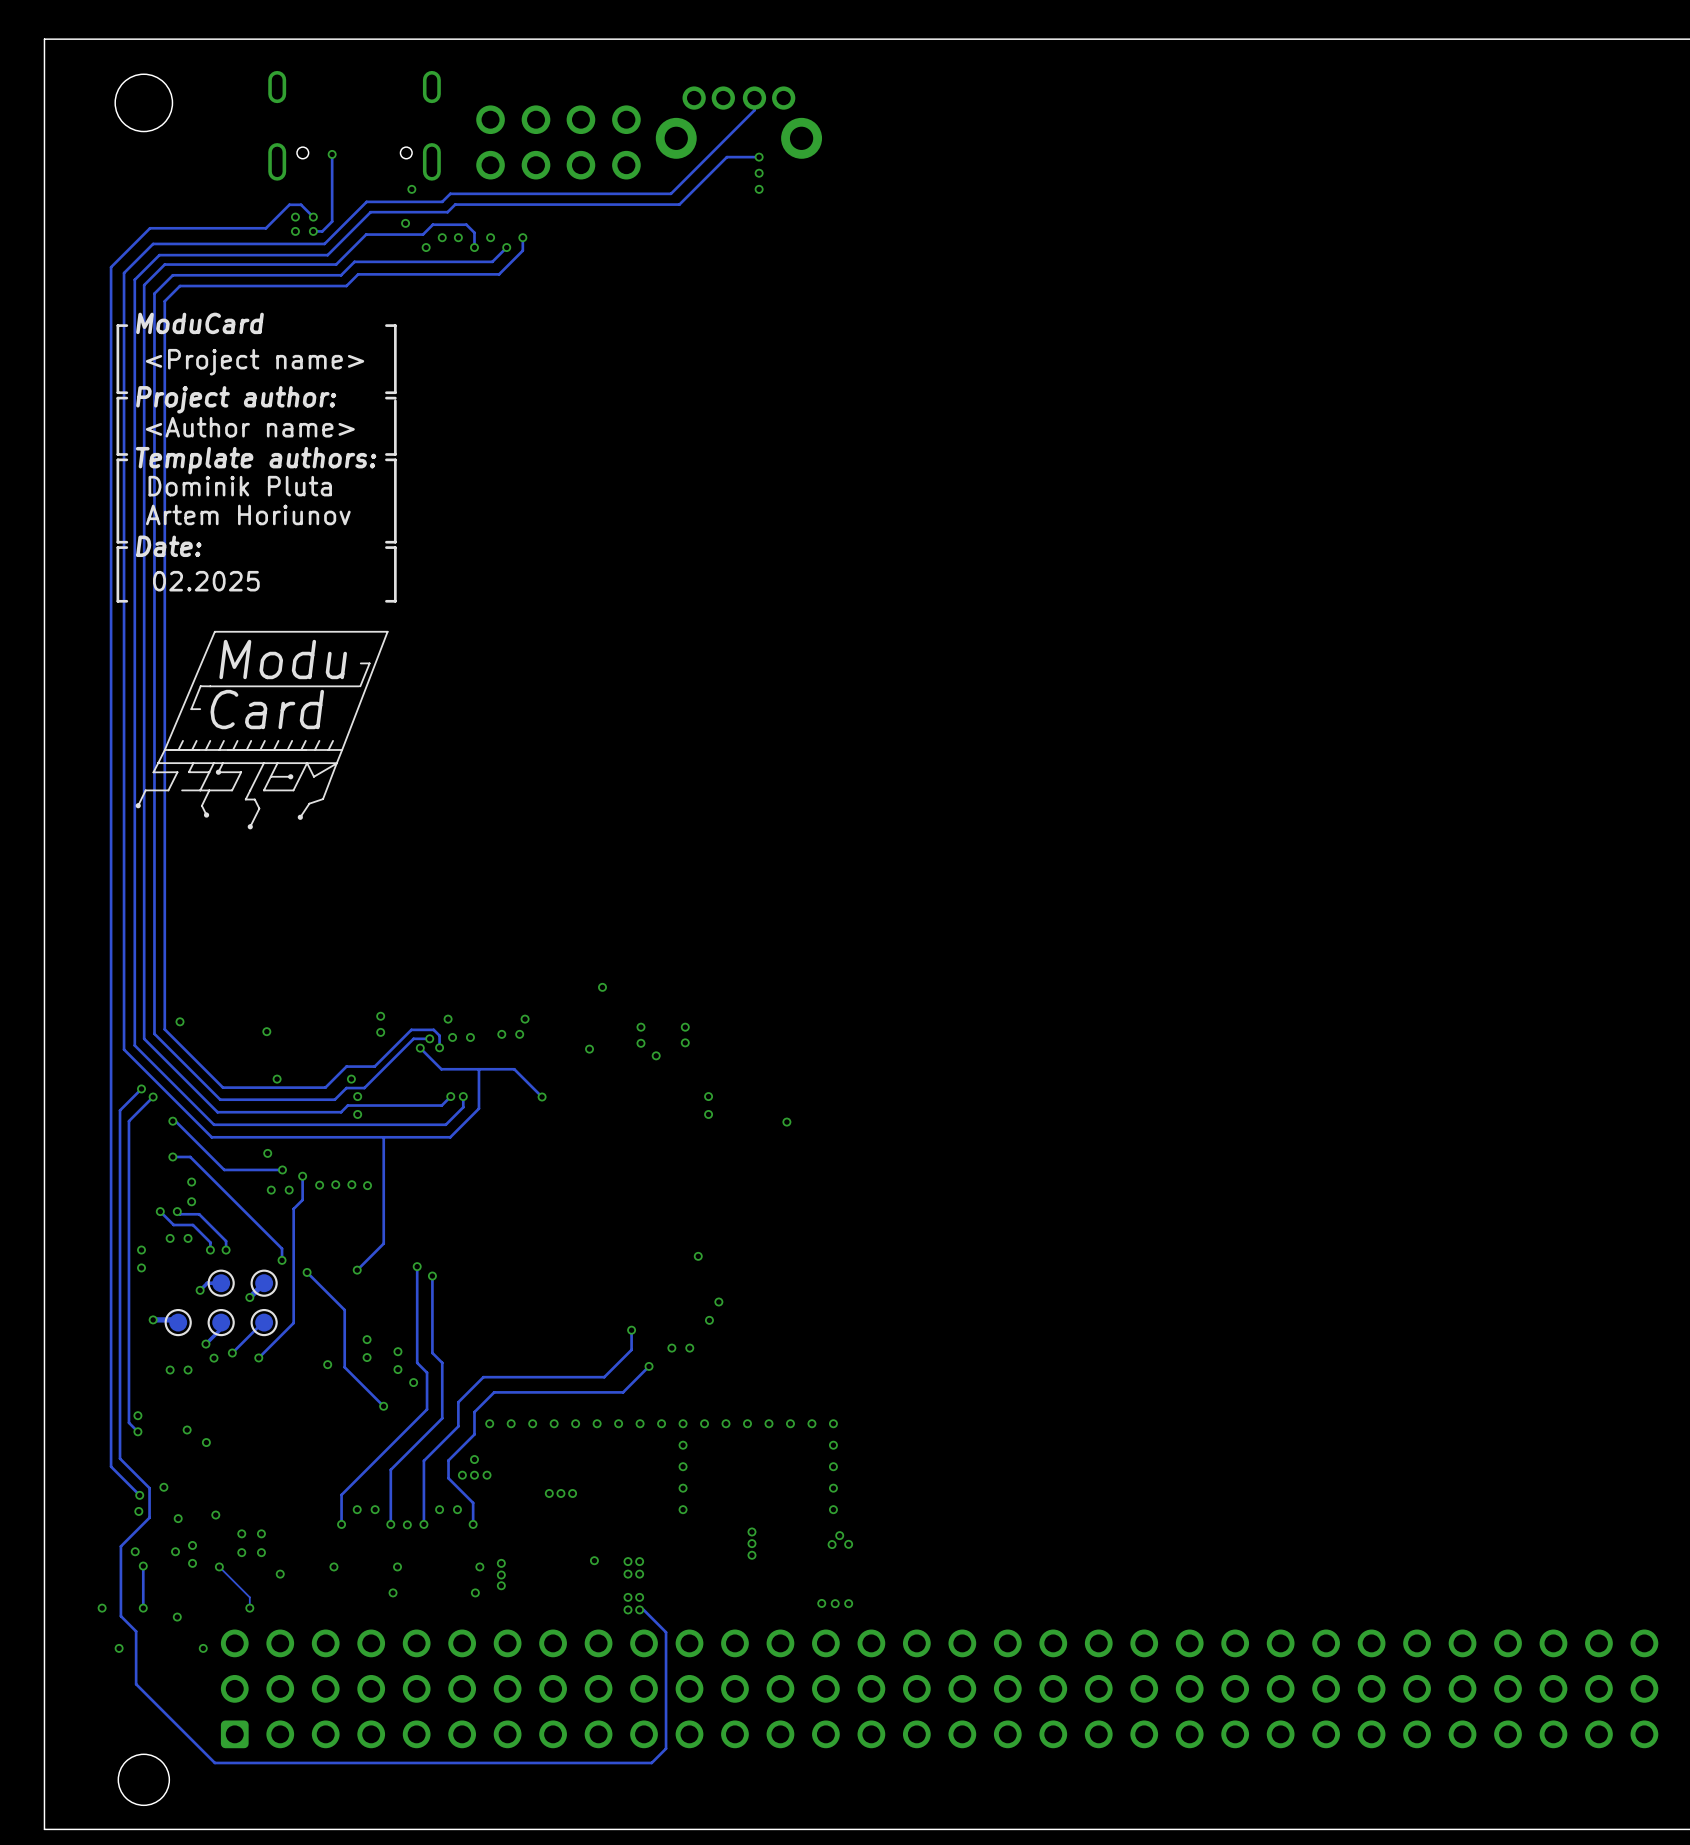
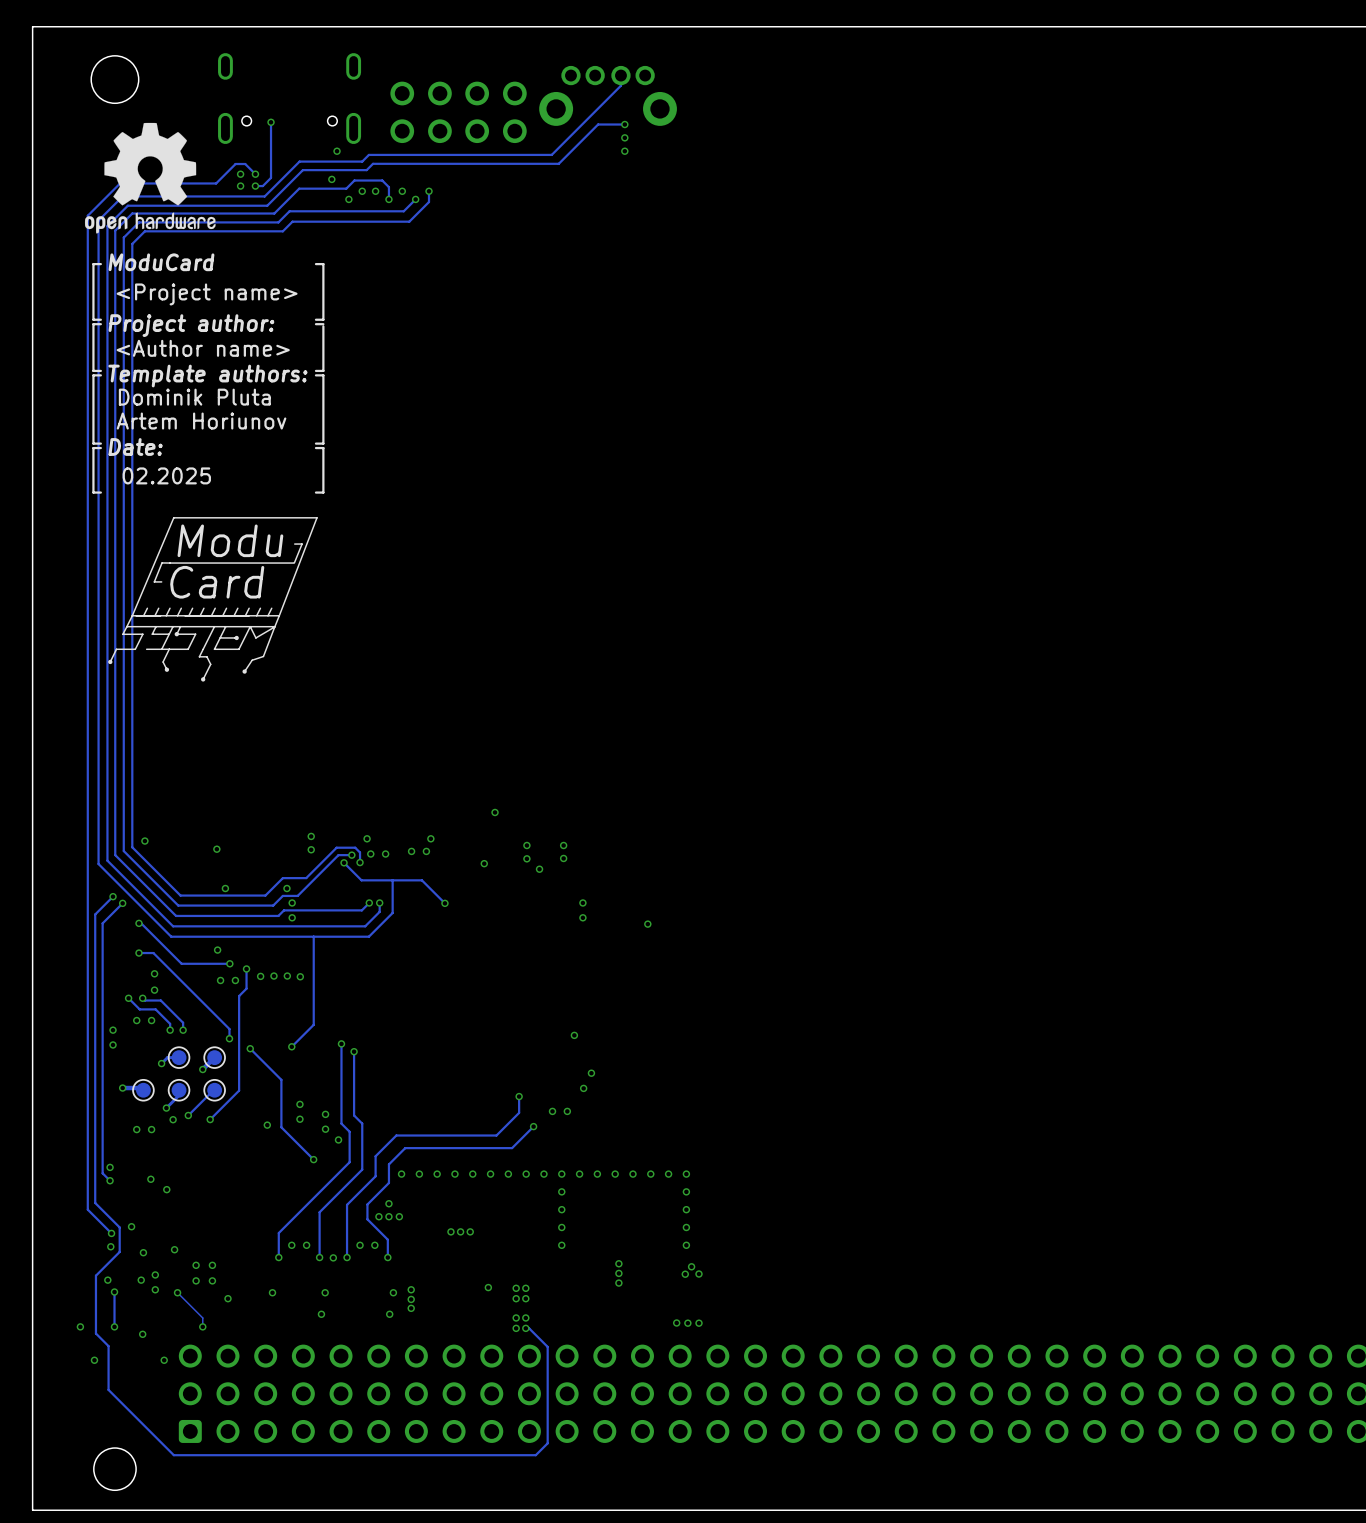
drawing: none -> [84, 122, 216, 234]

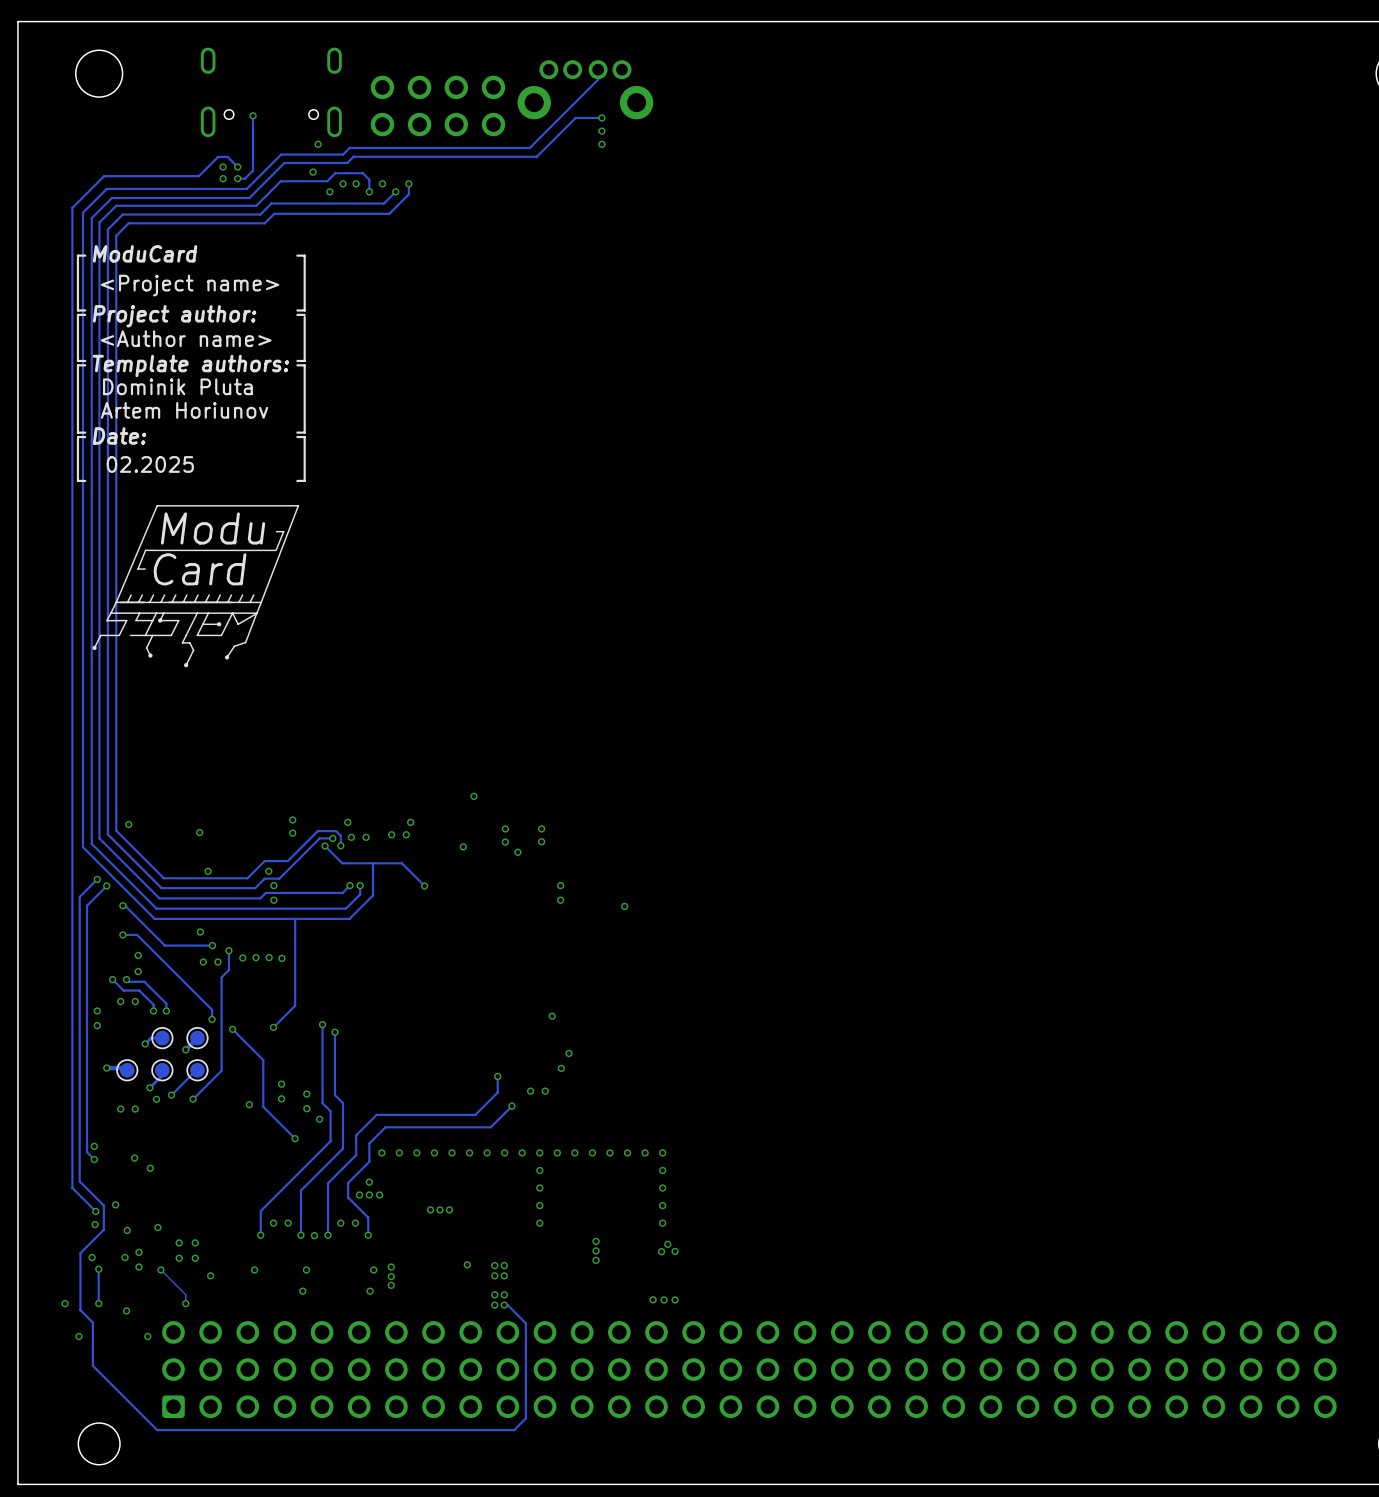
drawing: [84, 122, 216, 234] -> none

